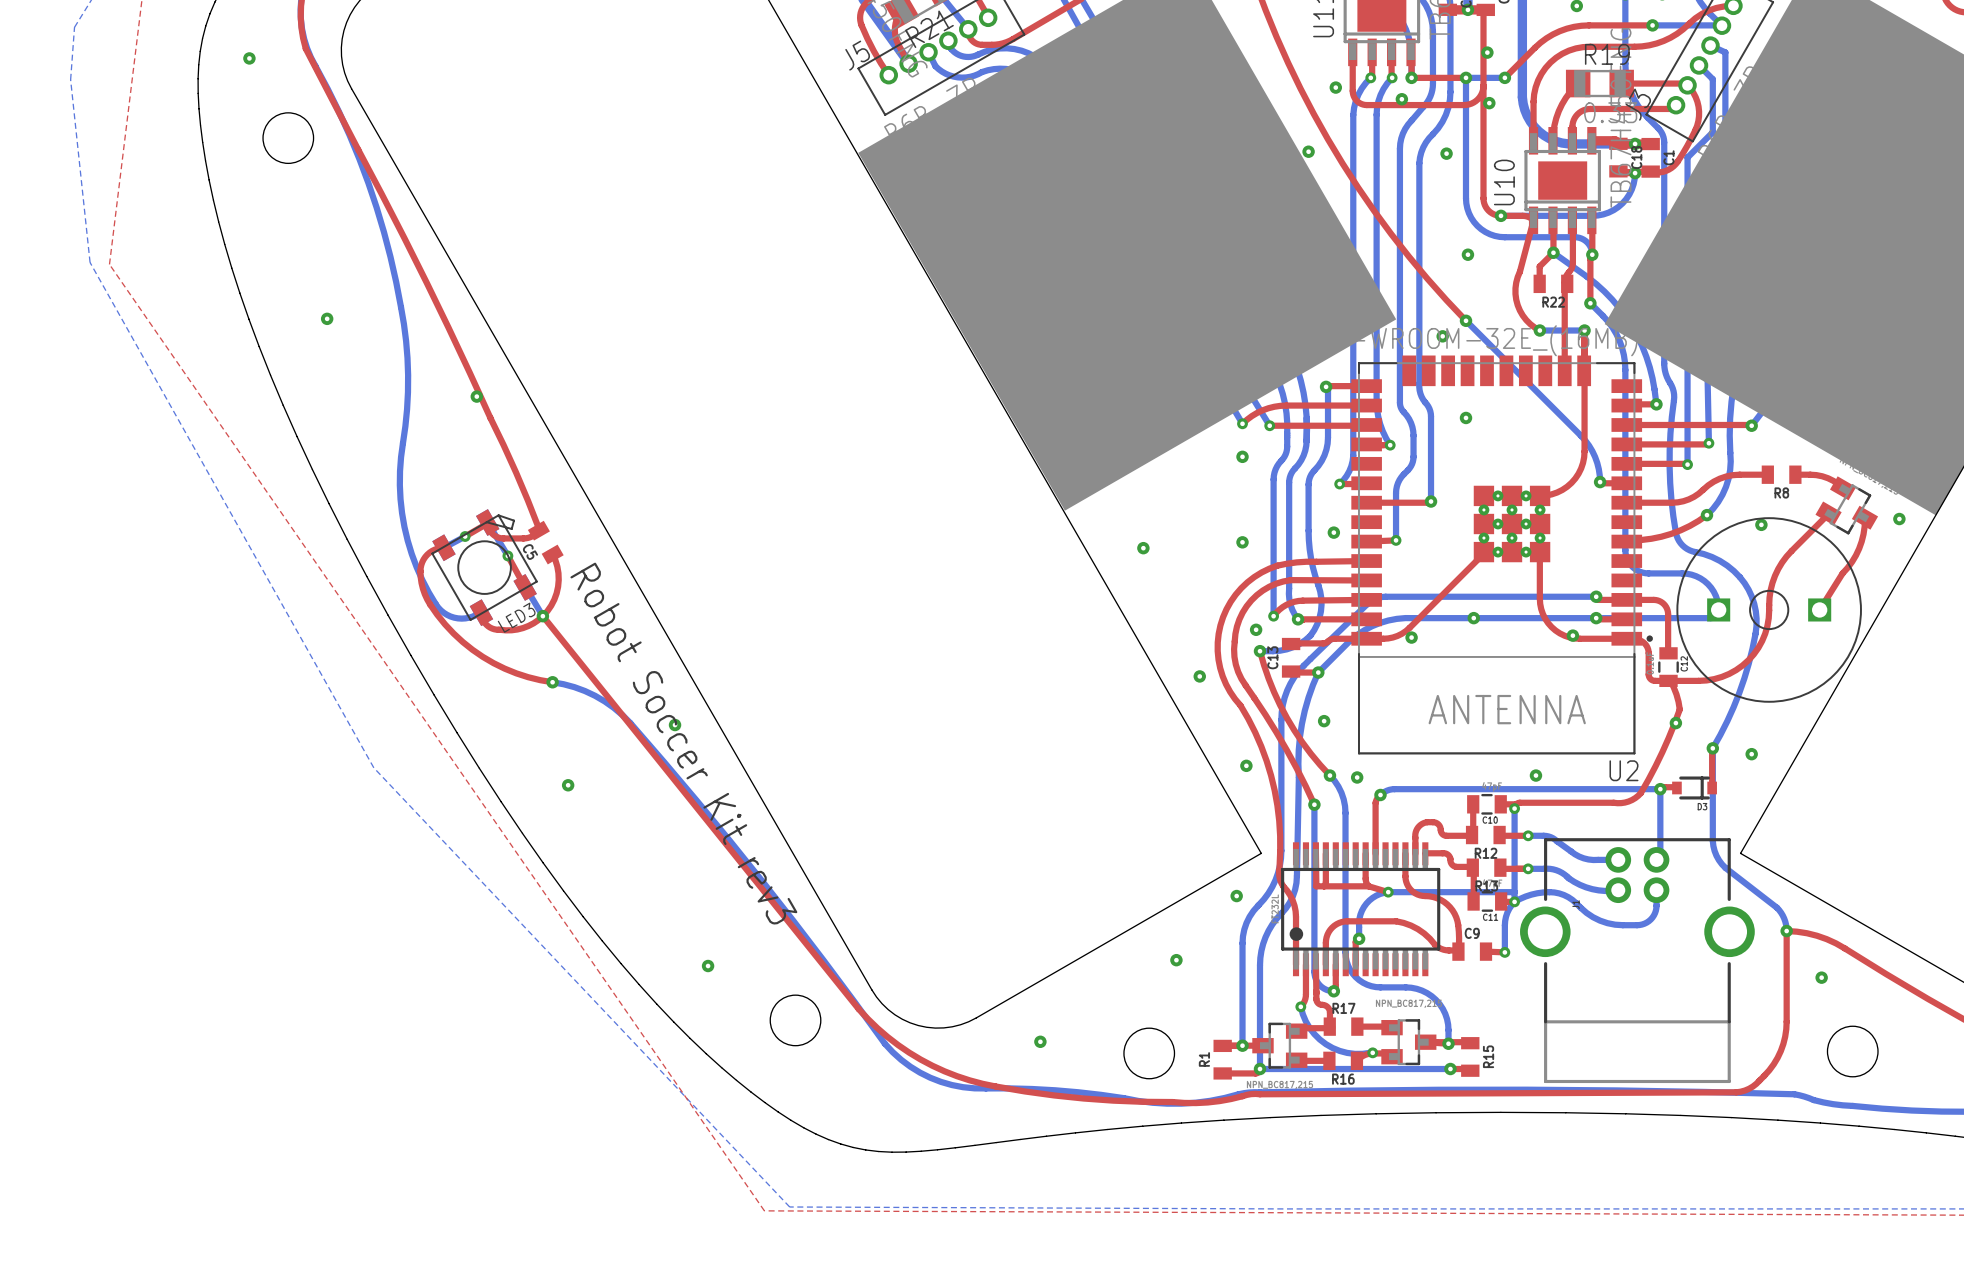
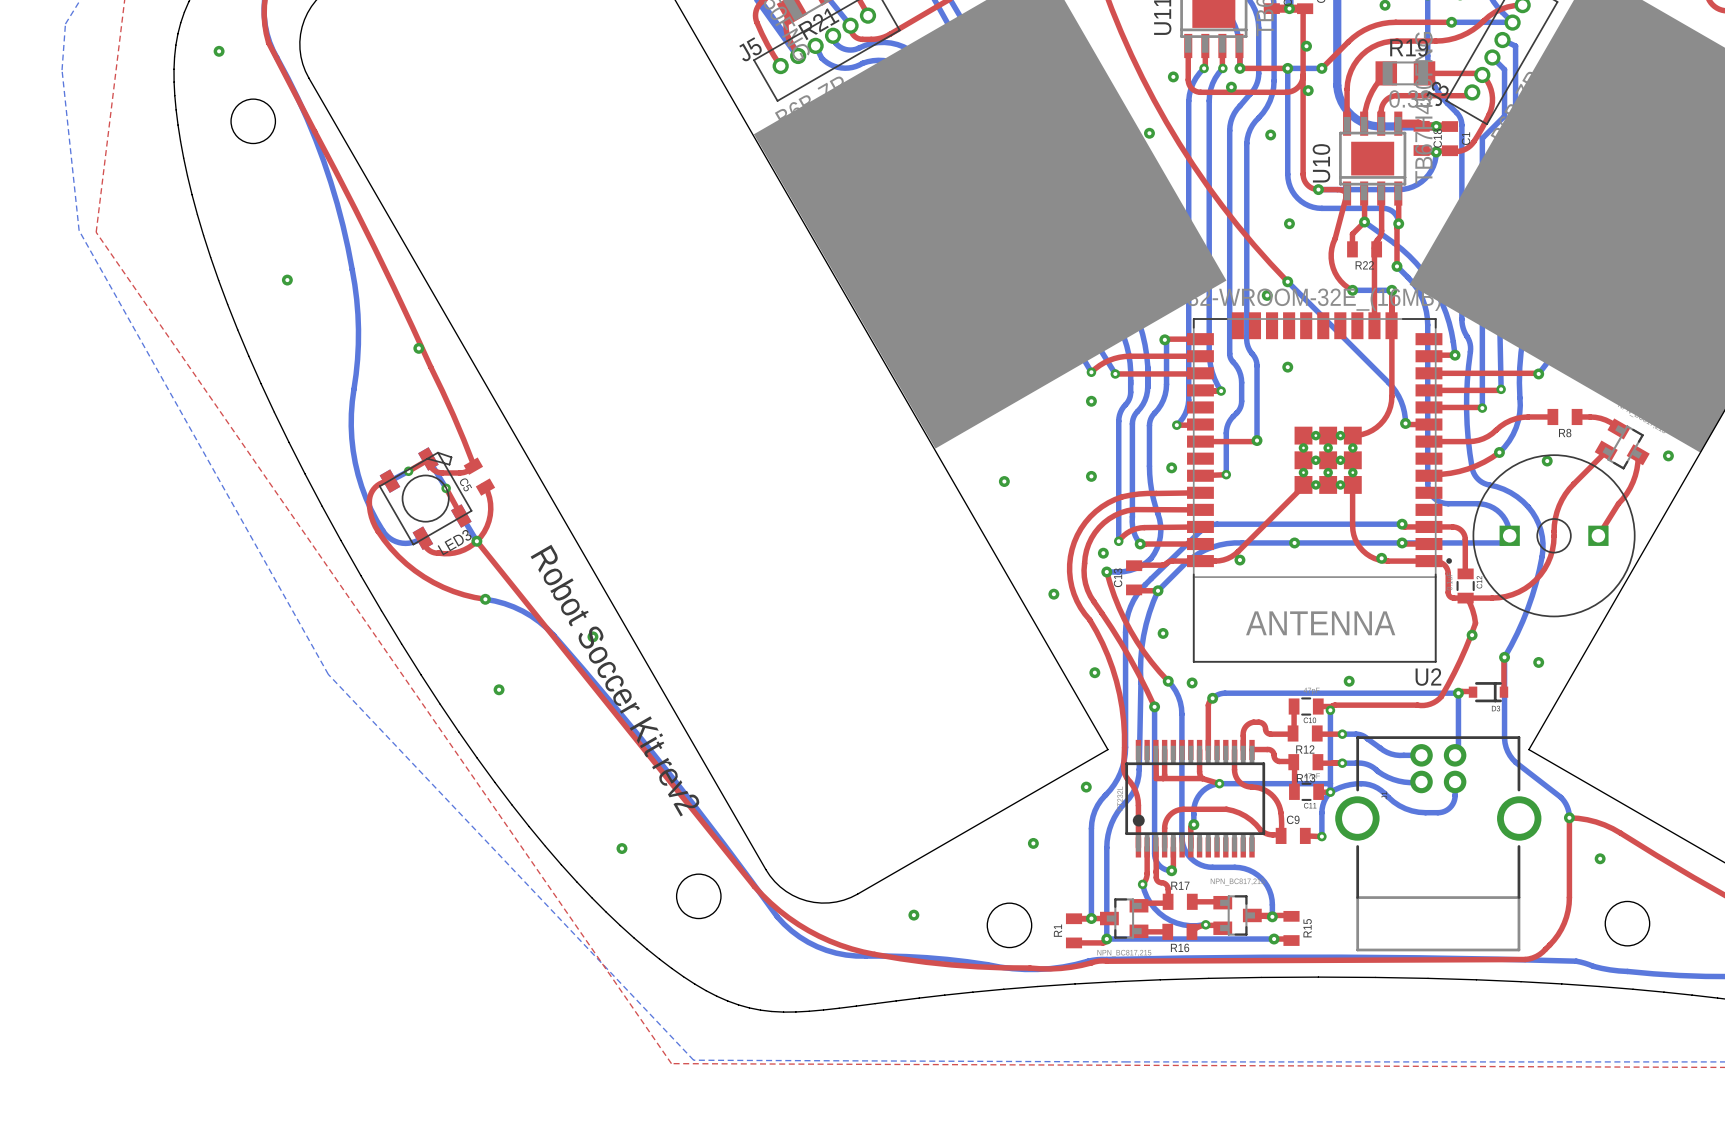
text: Robot Soccer Kit rev3 (683, 743) -> Robot Soccer Kit rev2 (615, 680)

